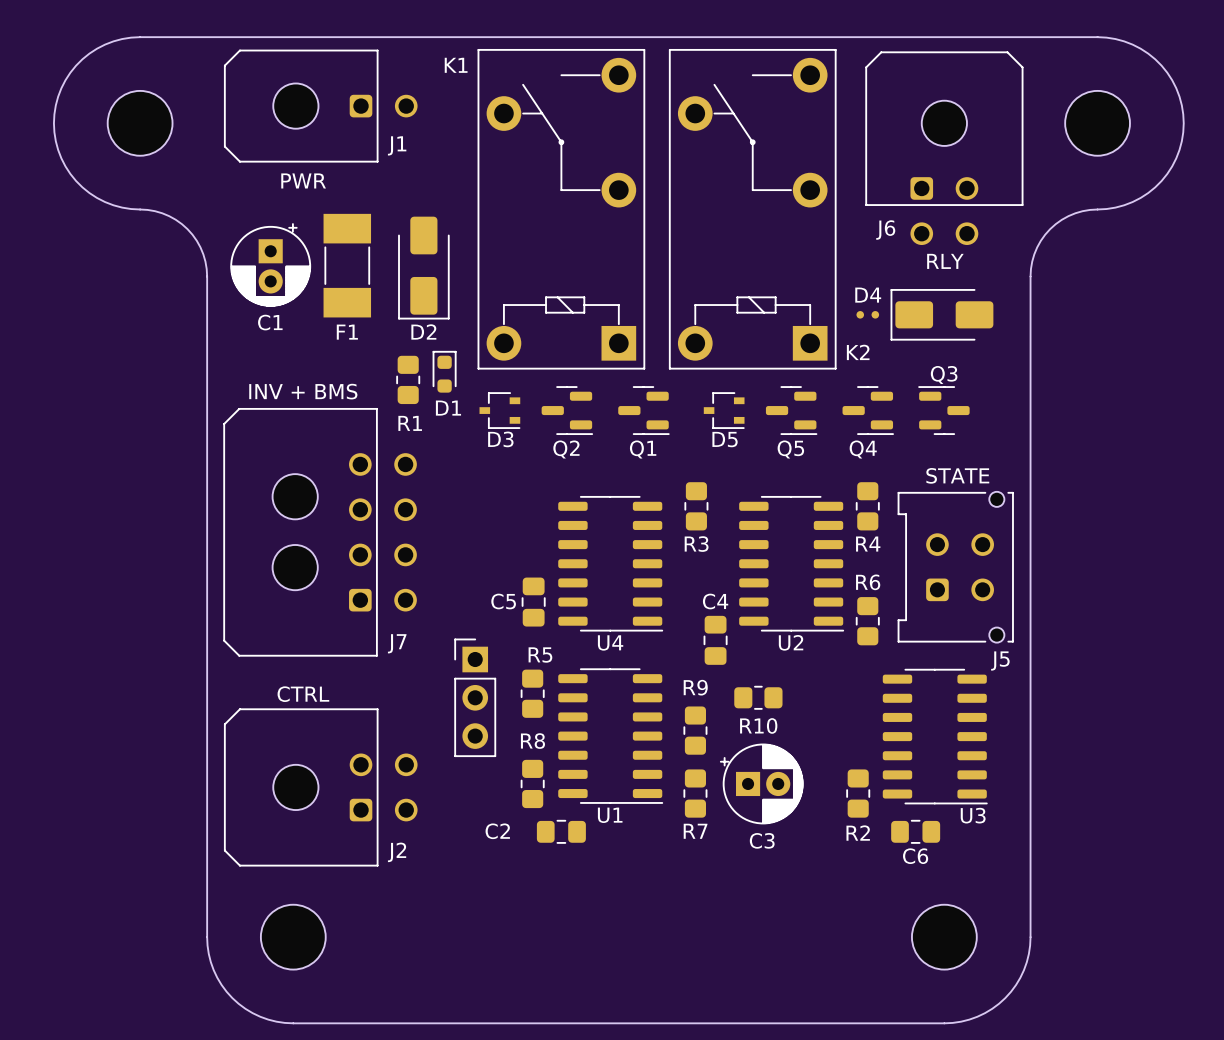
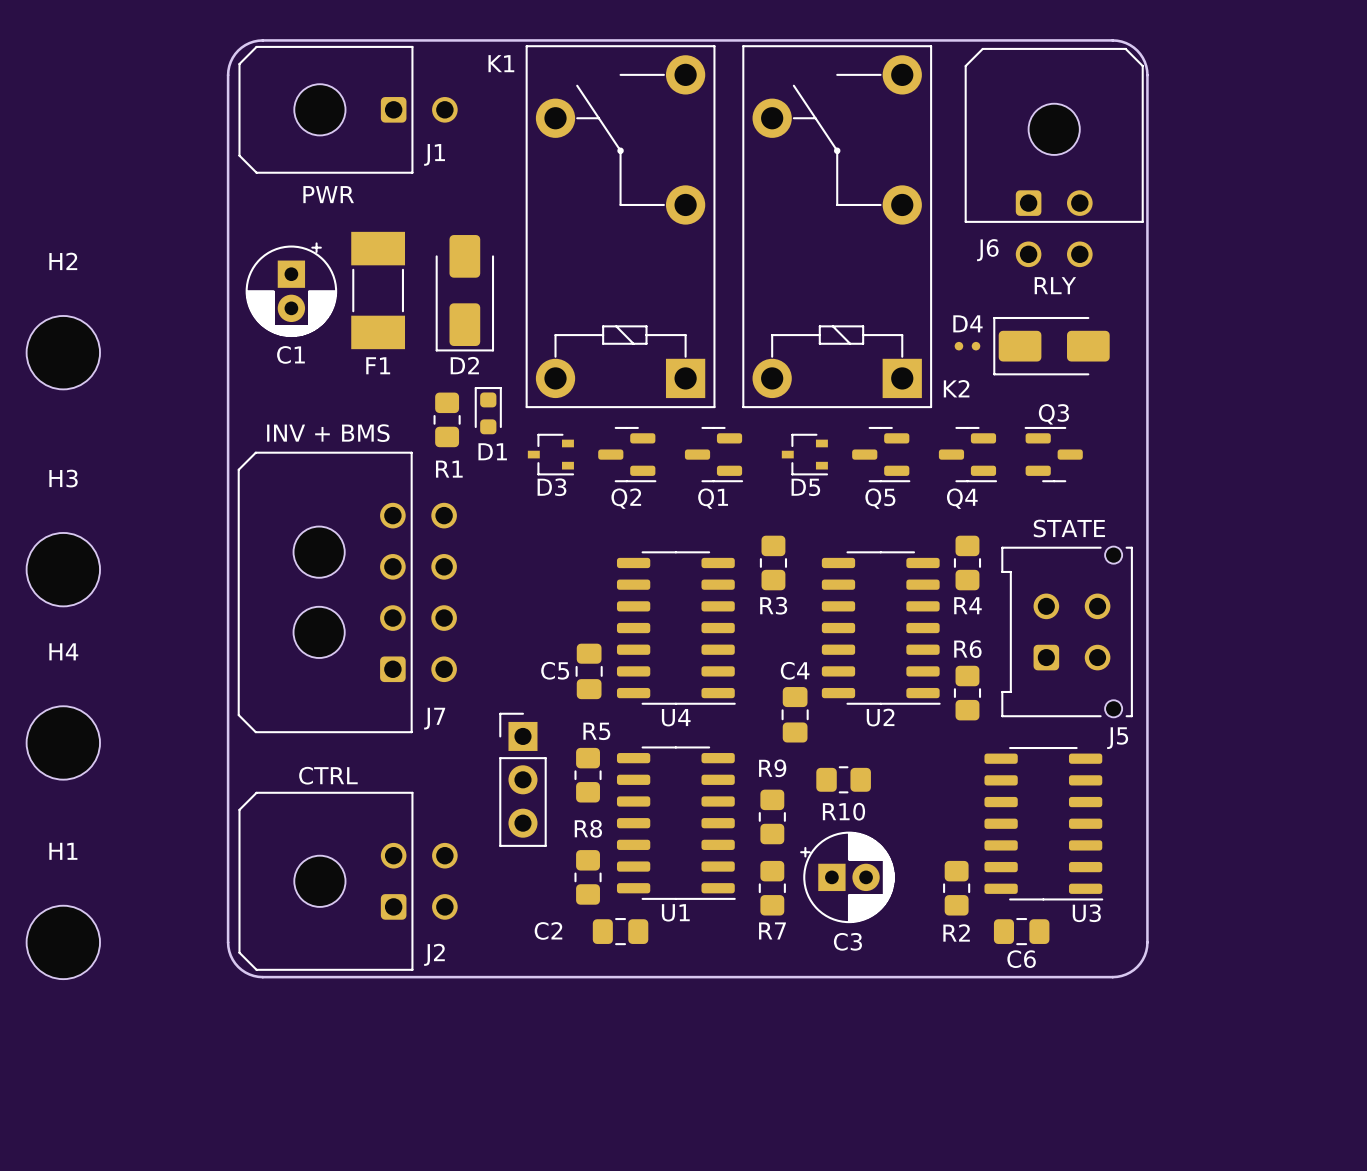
board edge: (140, 37) (1097, 37) (1115, 39) (1132, 44) (1148, 53) (1161, 65) (1176, 88) (1181, 105) (1183, 123) (1179, 149) (1167, 173) (1155, 187) (1132, 202) (1115, 207) (1082, 211) (1061, 219) (1045, 234) (1037, 247) (1032, 261) (1030, 276) (1030, 937) (1028, 953) (1023, 970) (1016, 985) (999, 1003) (985, 1013) (969, 1019) (944, 1023) (293, 1023) (276, 1021) (260, 1016) (238, 1003) (226, 991) (213, 970) (208, 953) (207, 937) (207, 276) (205, 261) (196, 240) (187, 229) (175, 219) (155, 211) (113, 205) (97, 197) (82, 187) (70, 173) (61, 158) (54, 132) (54, 114) (58, 96) (65, 80) (76, 65) (89, 53) (105, 44) (122, 39) (140, 37) -> (262, 40) (249, 43) (238, 50) (230, 61) (228, 75) (228, 942) (230, 955) (238, 966) (249, 974) (262, 977) (1112, 977) (1126, 974) (1137, 966) (1144, 955) (1147, 942) (1147, 75) (1144, 61) (1137, 50) (1126, 43) (1112, 40) (262, 40)
part: (140, 123) -> none
part: (1097, 123) -> none
H2: none -> (63, 352)
H3: none -> (63, 569)
H4: none -> (63, 742)
H1: none -> (63, 942)
part: (293, 937) -> none
part: (944, 937) -> none

